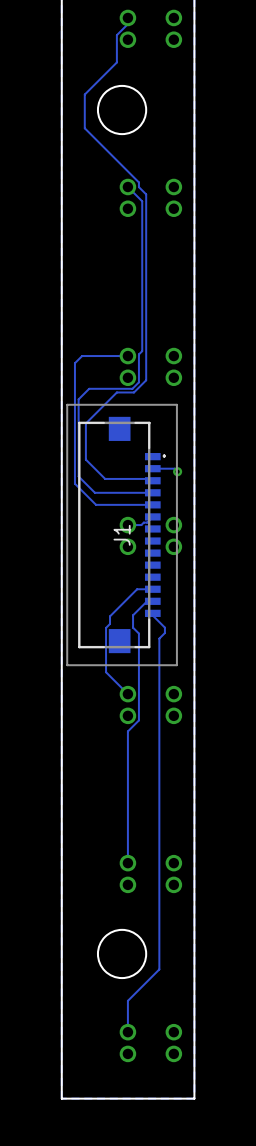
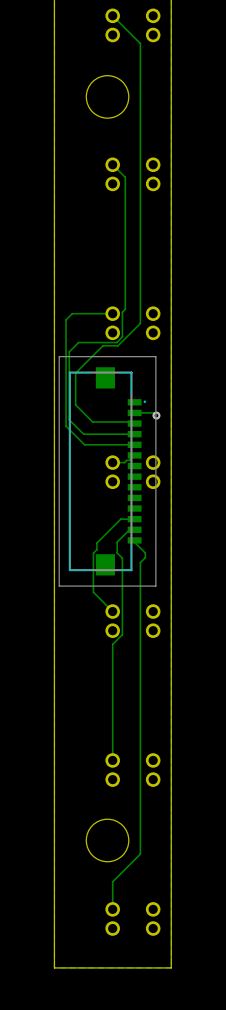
track: (127, 17) (127, 24) (116, 35) (116, 62) (84, 94) (84, 128) (138, 182) (138, 187) (146, 194) (146, 380) -> (112, 15) (140, 43) (140, 323) (128, 335)
J1 name: J1 (122, 535) -> none

